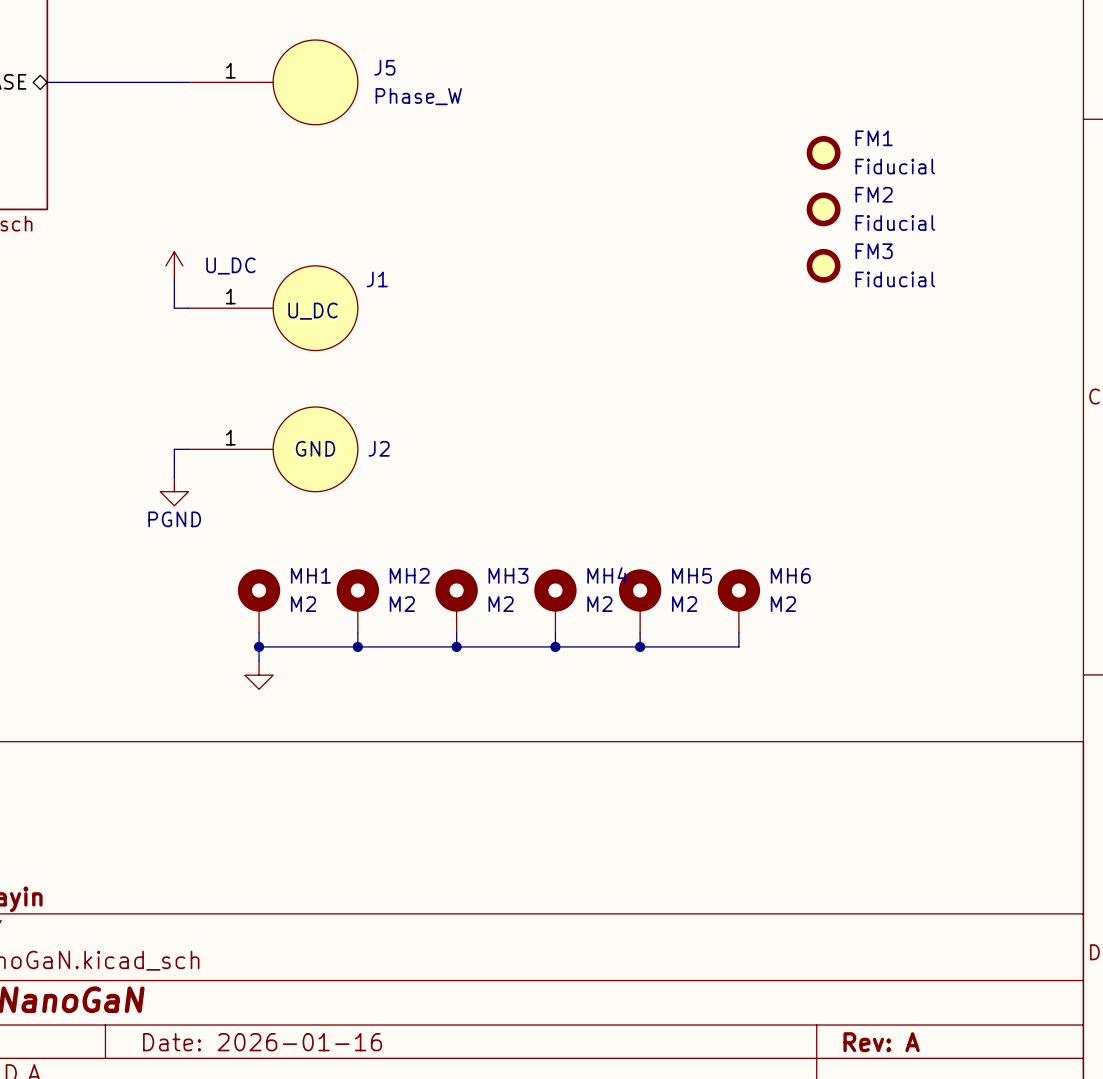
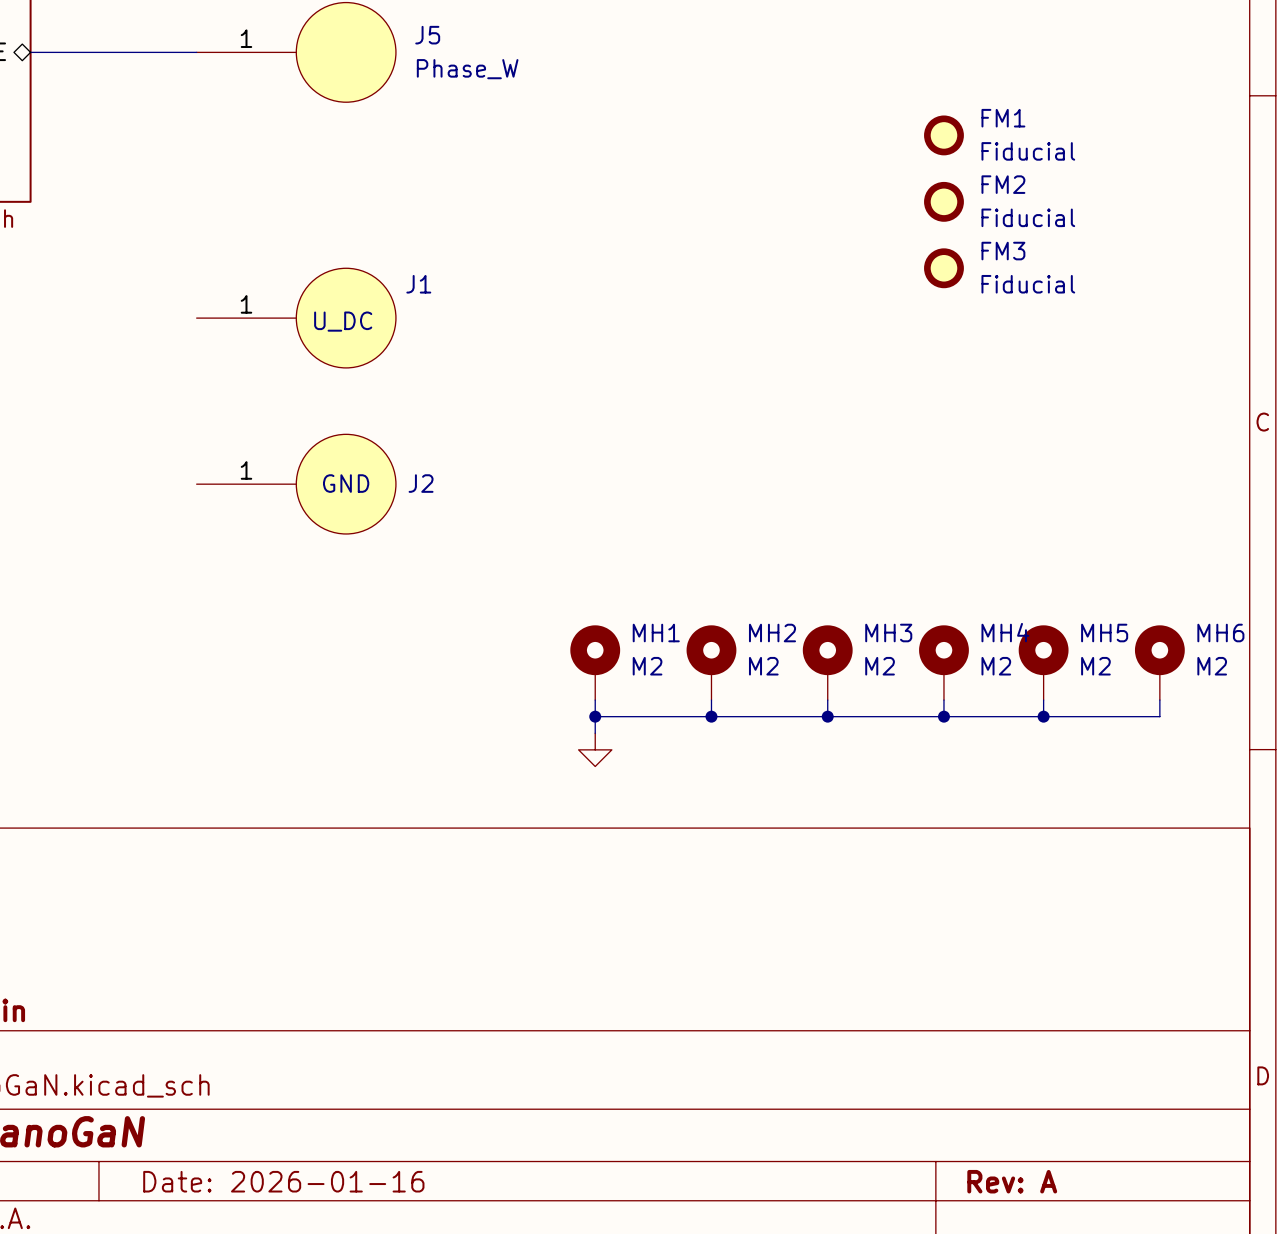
power symbol: U_DC (174, 265) -> none
wire: (174, 279) (174, 308) (188, 308) -> none
wire: (188, 449) (174, 449) (174, 477) -> none
power symbol: PGND (174, 491) -> none
MH1 position: (259, 601) -> (595, 662)
MH2 position: (357, 601) -> (711, 662)
MH3 position: (456, 601) -> (827, 662)
MH4 position: (555, 601) -> (943, 662)
MH5 position: (640, 601) -> (1043, 662)
MH6 position: (738, 601) -> (1159, 662)
wire: (259, 632) (259, 661) -> (595, 700) (595, 733)
wire: (357, 632) (357, 646) -> (711, 700) (711, 716)
wire: (456, 632) (456, 646) -> (827, 700) (827, 716)
wire: (555, 632) (555, 646) -> (943, 700) (943, 716)
wire: (640, 632) (640, 646) -> (1043, 700) (1043, 716)
wire: (738, 632) (738, 646) -> (1159, 700) (1159, 716) (844, 716)
wire: (259, 646) (527, 646) -> none
junction: (259, 646) -> none
junction: (357, 646) -> none
junction: (456, 646) -> none
junction position: (555, 646) -> (595, 716)
junction position: (640, 646) -> (711, 716)
junction: none -> (827, 716)
junction: none -> (943, 716)
junction: none -> (1043, 716)
power symbol position: (259, 675) -> (595, 749)

